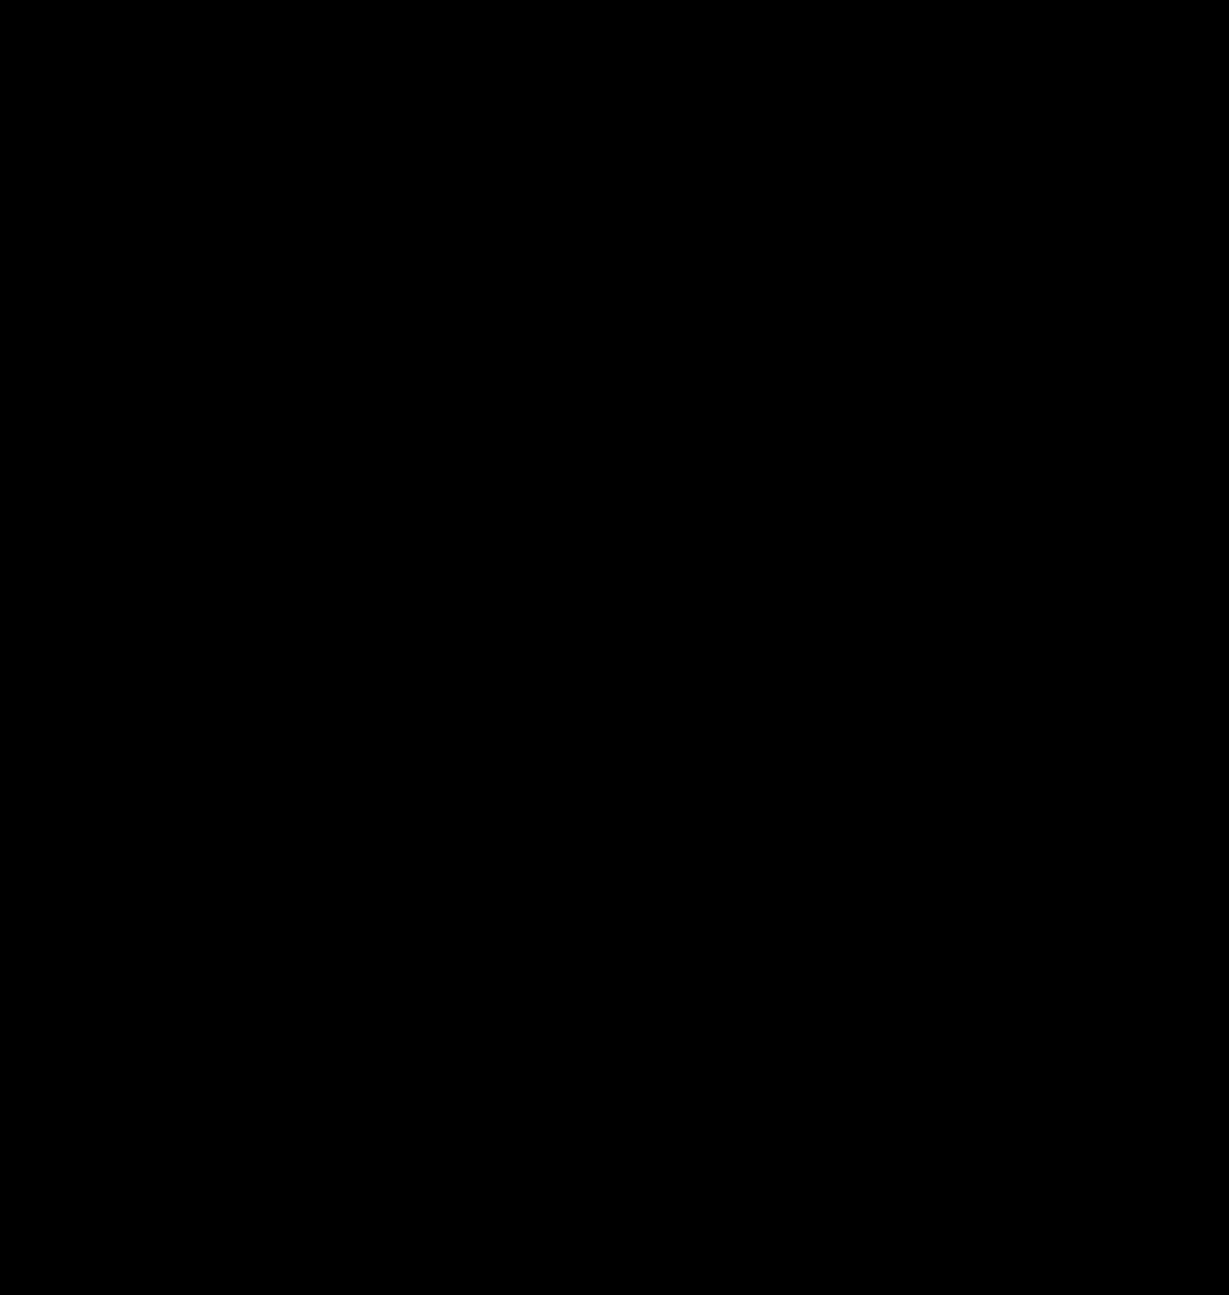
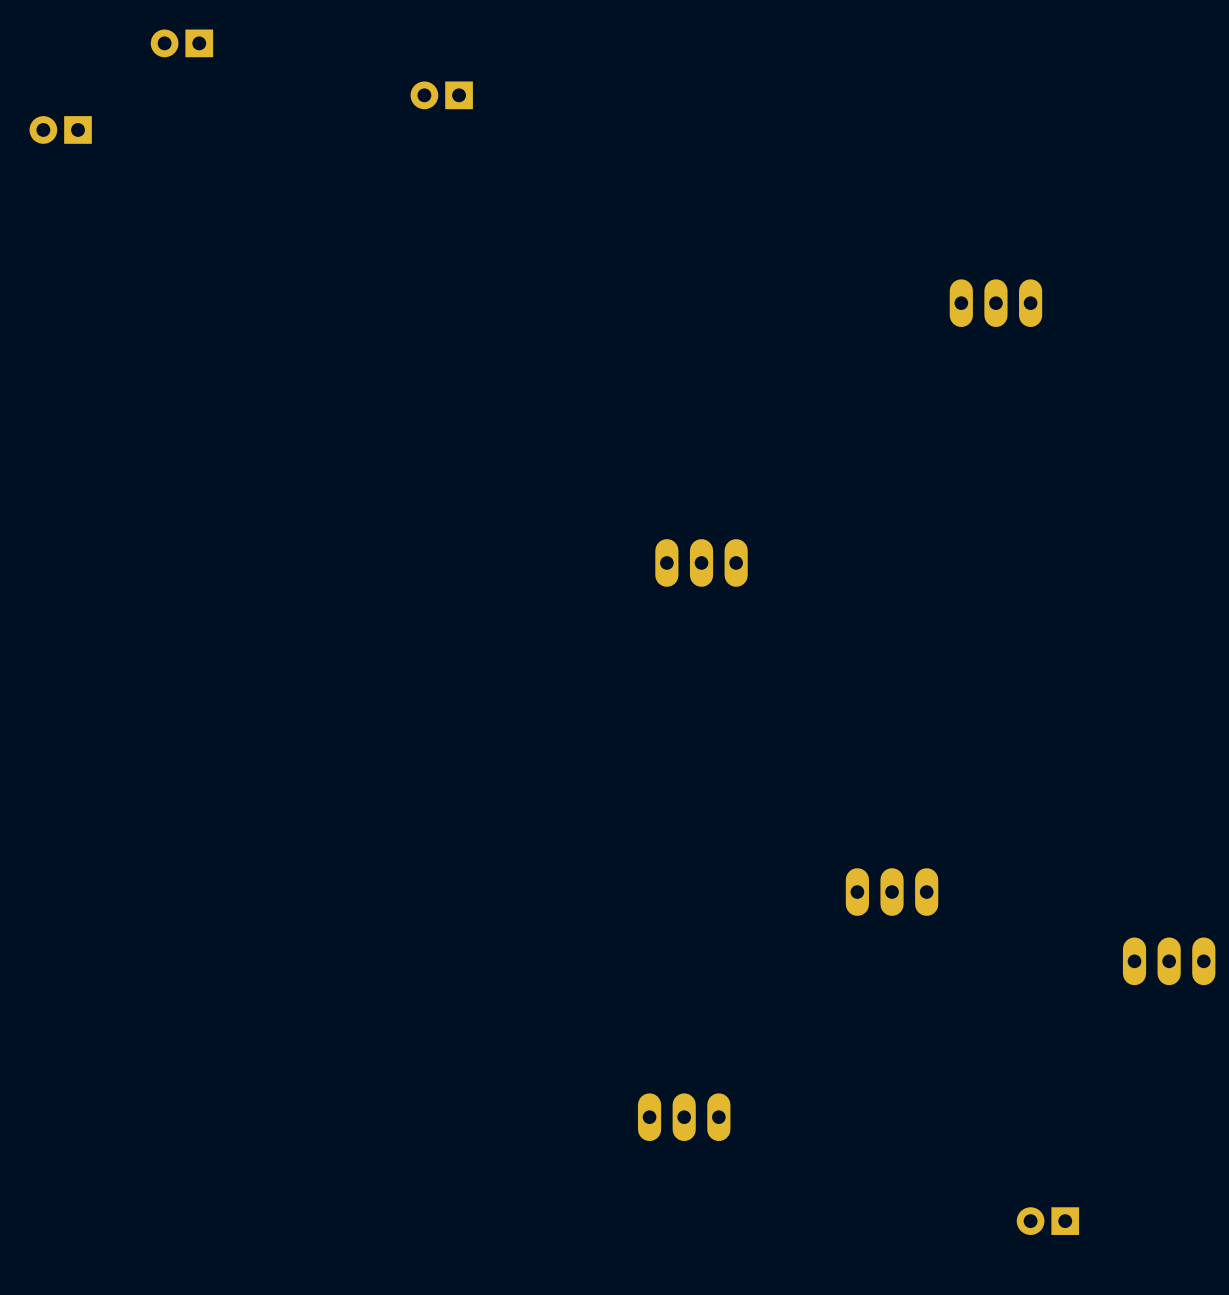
part: none -> (181, 43)
part: none -> (441, 95)
part: none -> (60, 129)
part: none -> (995, 303)
part: none -> (701, 562)
part: none -> (892, 892)
part: none -> (1169, 961)
part: none -> (684, 1117)
part: none -> (1047, 1221)

